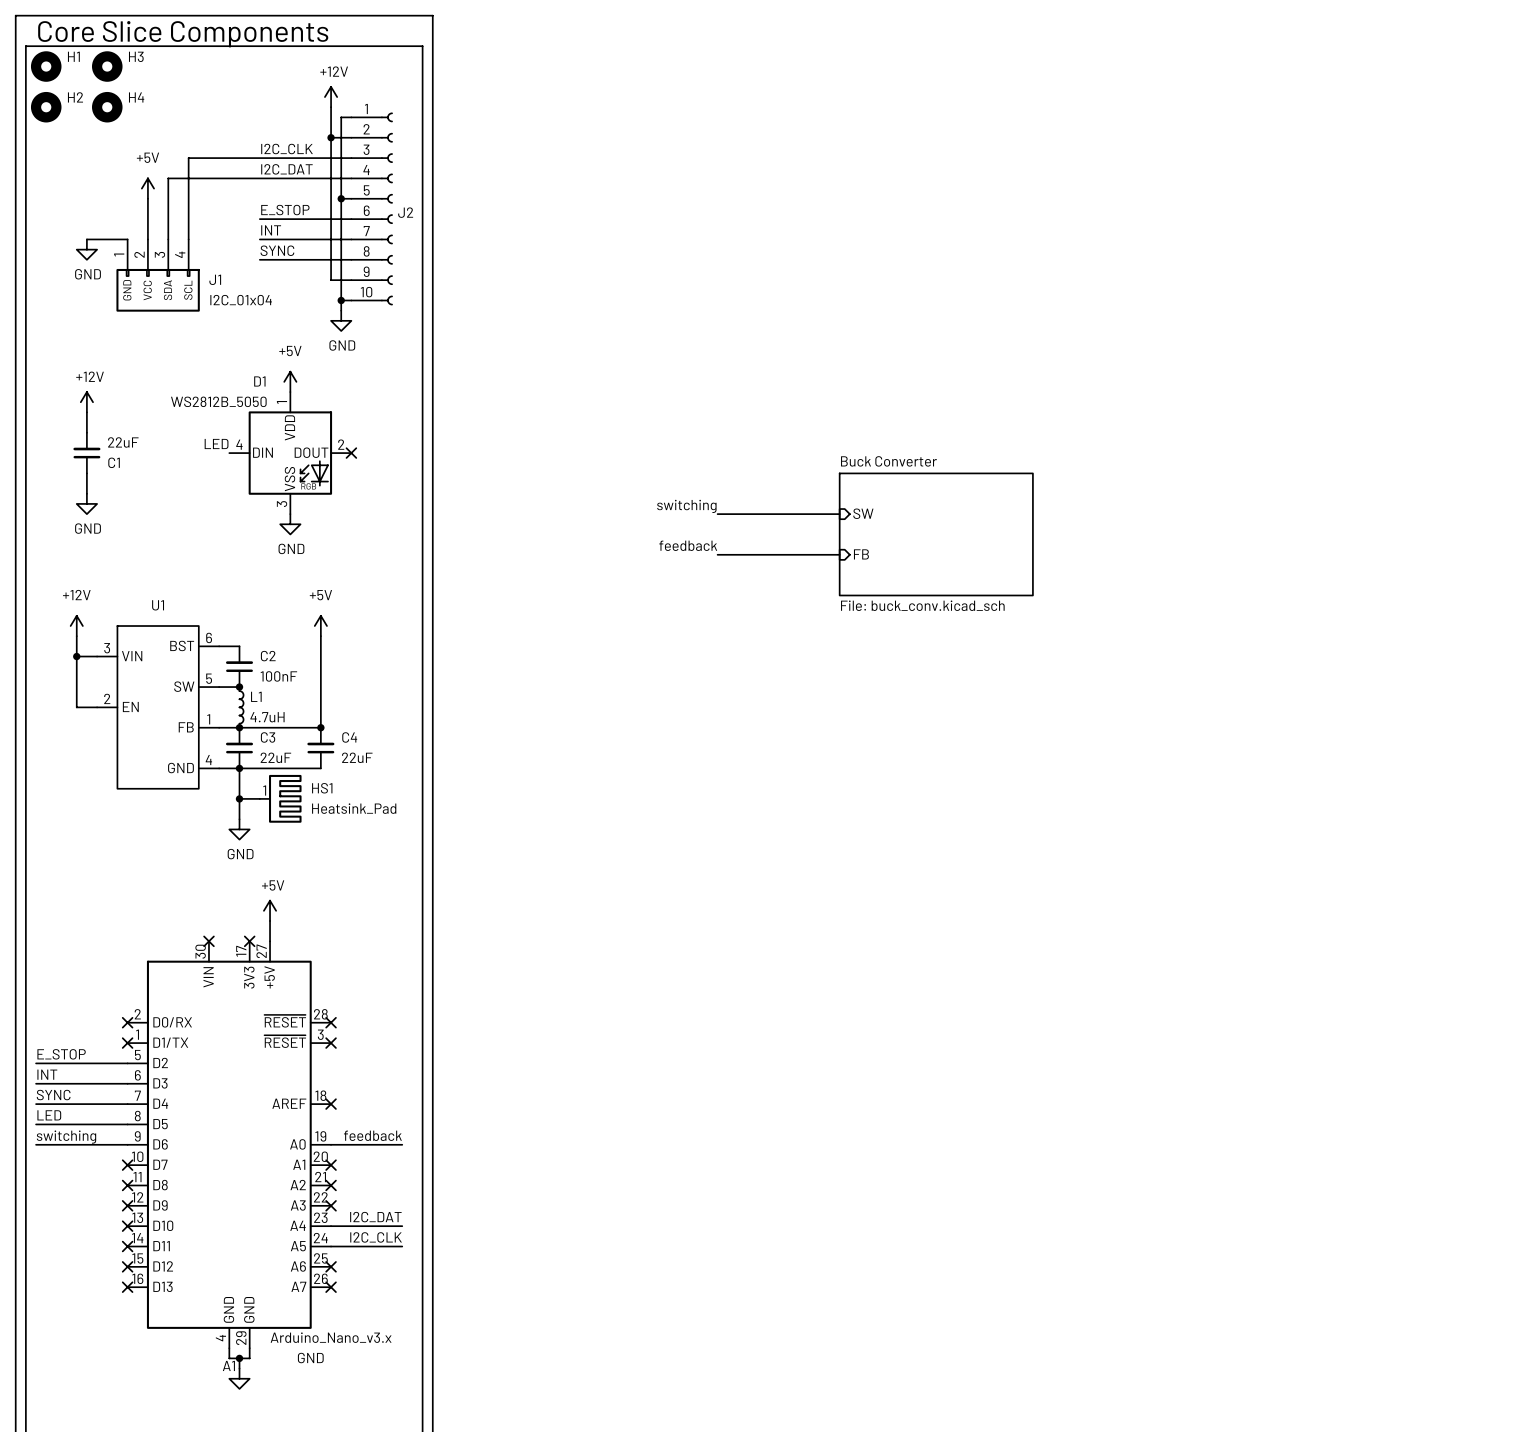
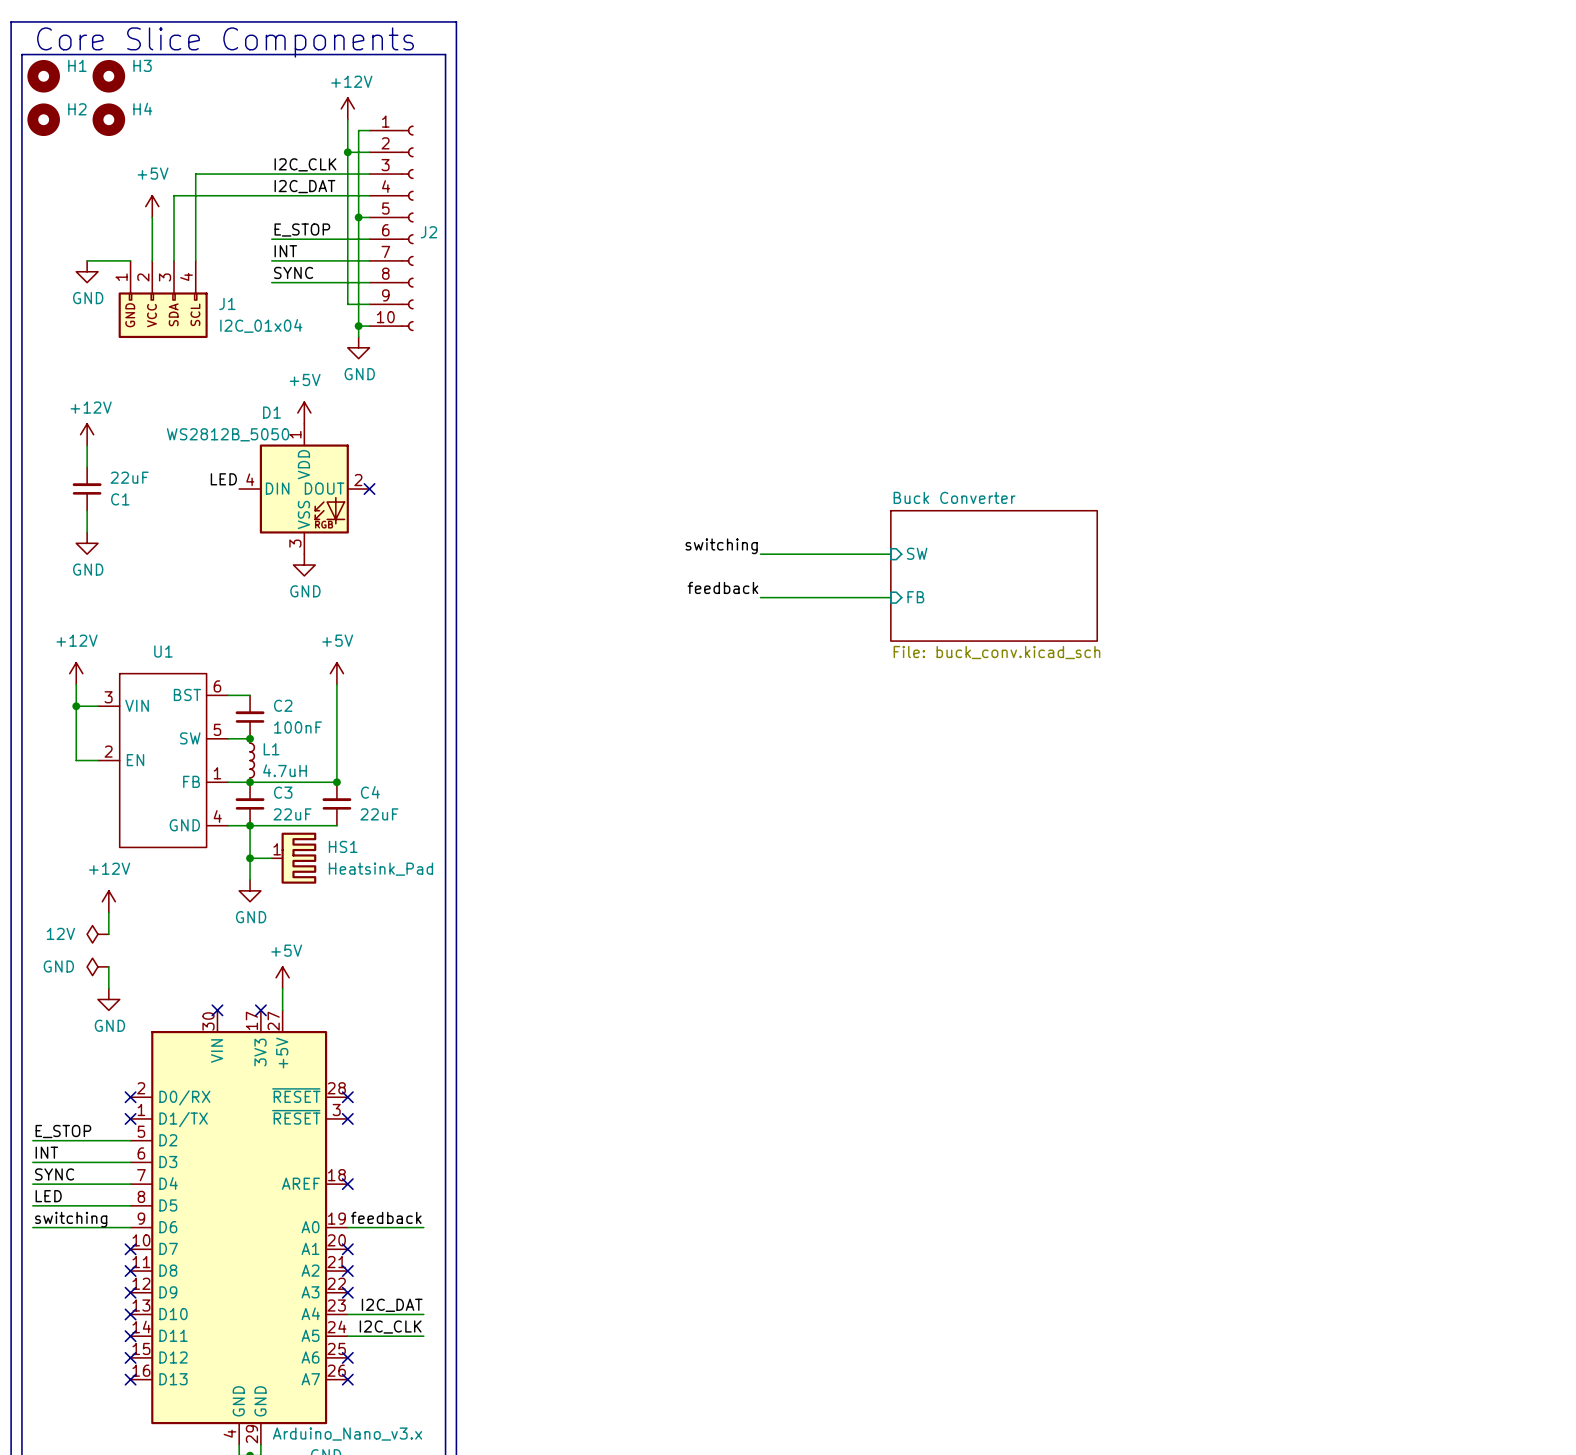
power symbol: none -> +12V (108, 901)
wire: none -> (108, 912) (108, 934)
power symbol: none -> 12V (97, 934)
power symbol: none -> GND (97, 966)
wire: none -> (108, 966) (108, 988)
power symbol: none -> GND (108, 999)

